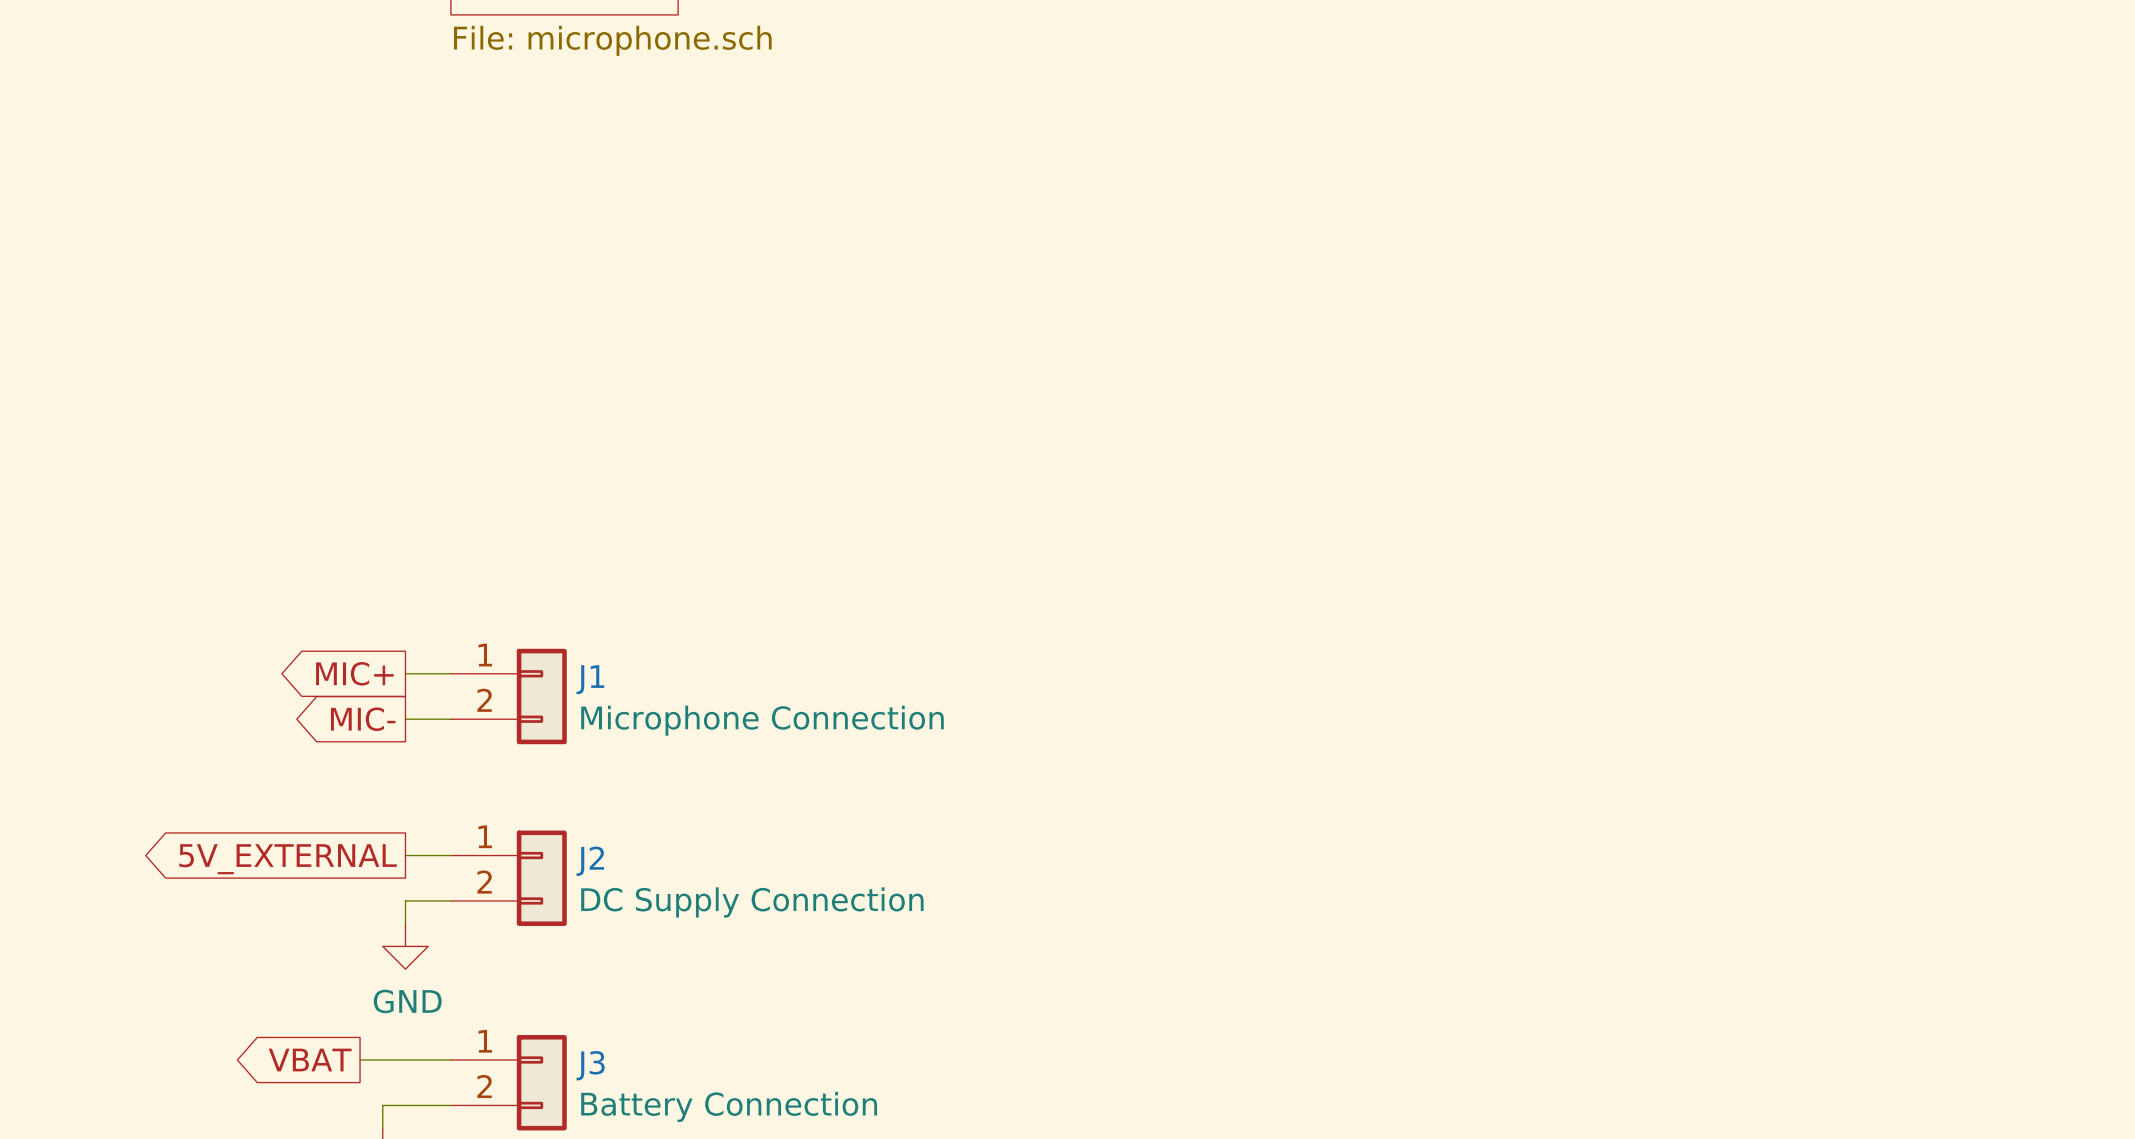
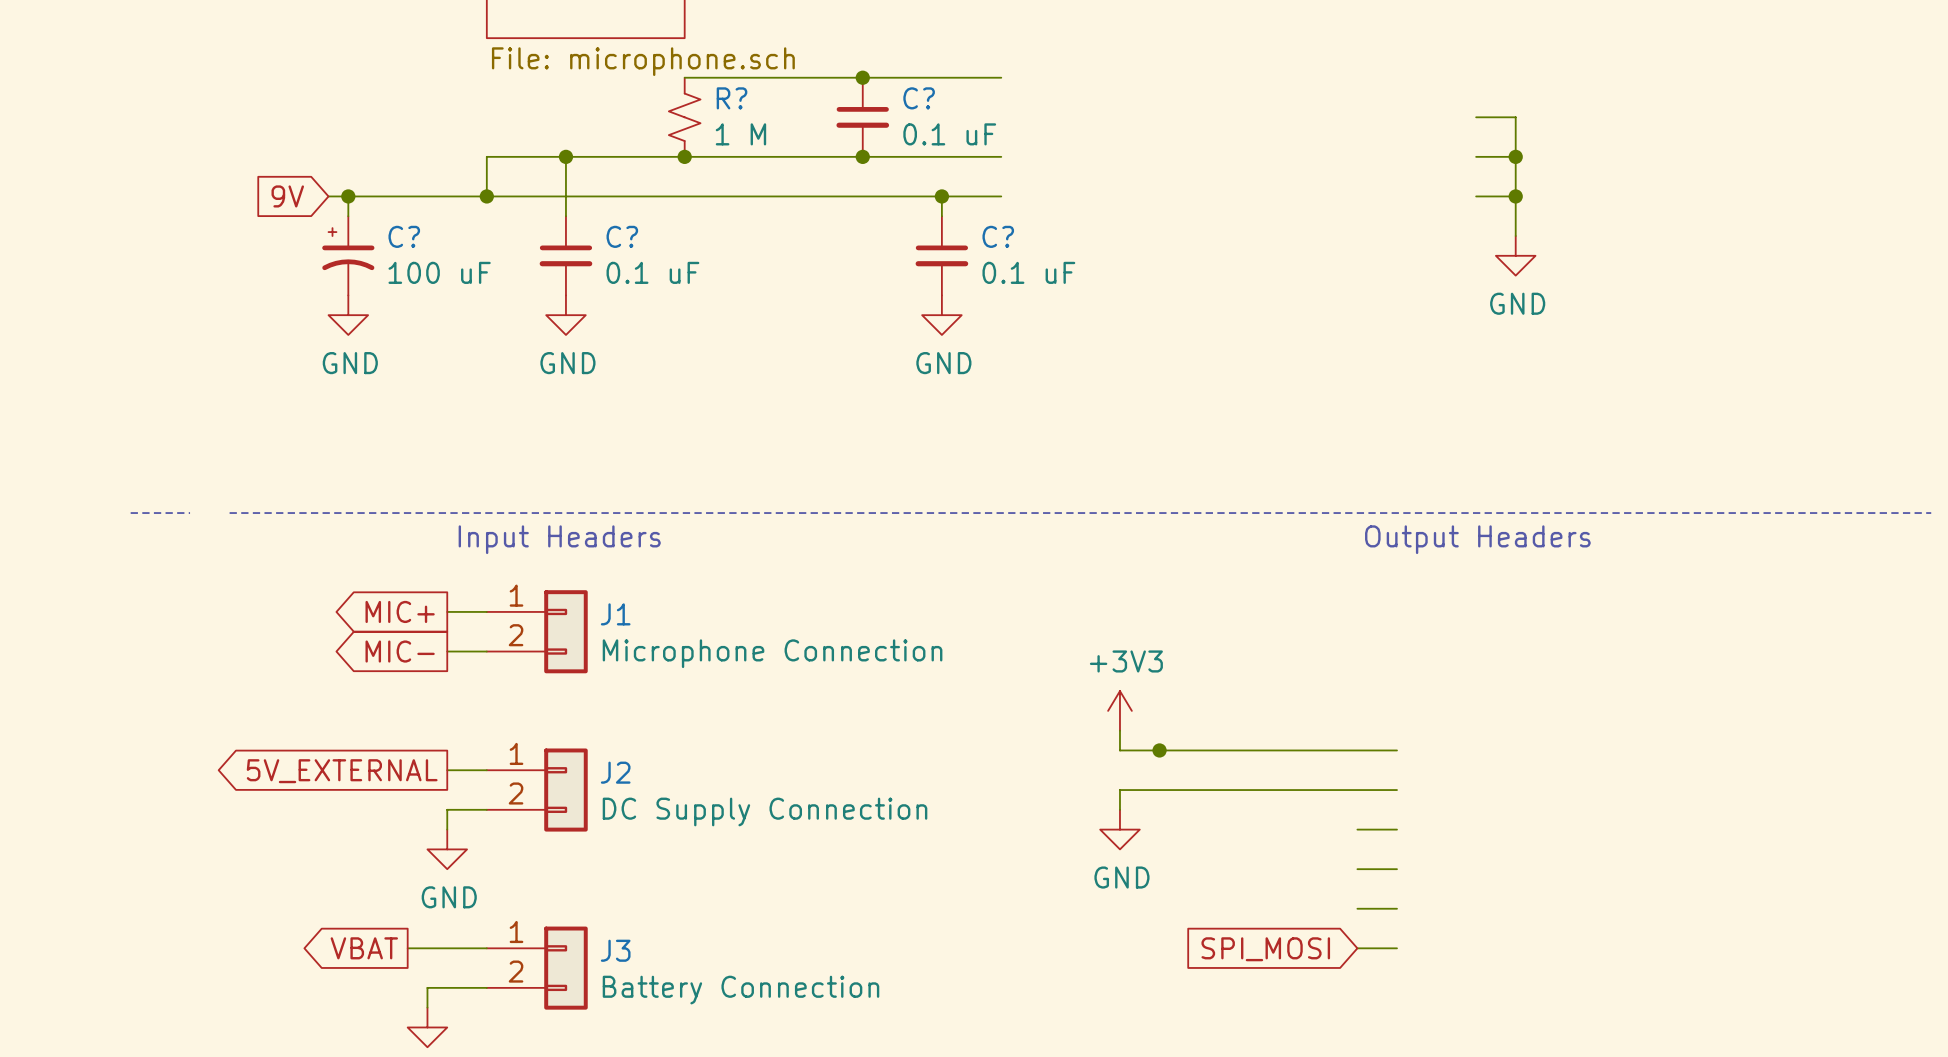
wire: none -> (684, 77) (1001, 77)
junction: none -> (862, 77)
R?: none -> 1 M (684, 117)
C?: none -> 0.1 uF (862, 117)
wire: none -> (1476, 117) (1515, 117) (1515, 236)
wire: none -> (565, 156) (565, 216)
junction: none -> (565, 156)
junction: none -> (684, 156)
junction: none -> (862, 156)
wire: none -> (1001, 156) (486, 156) (486, 196)
wire: none -> (1476, 156) (1515, 156)
junction: none -> (1515, 156)
global label: none -> 9V (287, 196)
wire: none -> (328, 196) (1001, 196)
wire: none -> (348, 196) (348, 216)
junction: none -> (348, 196)
junction: none -> (486, 196)
wire: none -> (941, 196) (941, 216)
junction: none -> (941, 196)
wire: none -> (1476, 196) (1515, 196)
junction: none -> (1515, 196)
C?: none -> 100 uF (348, 255)
C?: none -> 0.1 uF (565, 255)
C?: none -> 0.1 uF (941, 255)
power symbol: none -> GND (1515, 255)
power symbol: none -> GND (348, 315)
power symbol: none -> GND (565, 315)
power symbol: none -> GND (941, 315)
line: none -> (130, 513) (190, 513)
line: none -> (229, 513) (1931, 513)
text: none -> Input Headers (559, 539)
text: none -> Output Headers (1477, 539)
power symbol: none -> +3V3 (1119, 710)
wire: none -> (1119, 730) (1119, 750) (1396, 750)
junction: none -> (1159, 750)
wire: none -> (1396, 790) (1119, 790) (1119, 809)
power symbol: none -> GND (1119, 829)
wire: none -> (1357, 829) (1396, 829)
wire: none -> (1357, 869) (1396, 869)
wire: none -> (1357, 908) (1396, 908)
wire: none -> (1357, 948) (1396, 948)
global label: none -> SPI_MOSI (1265, 949)

